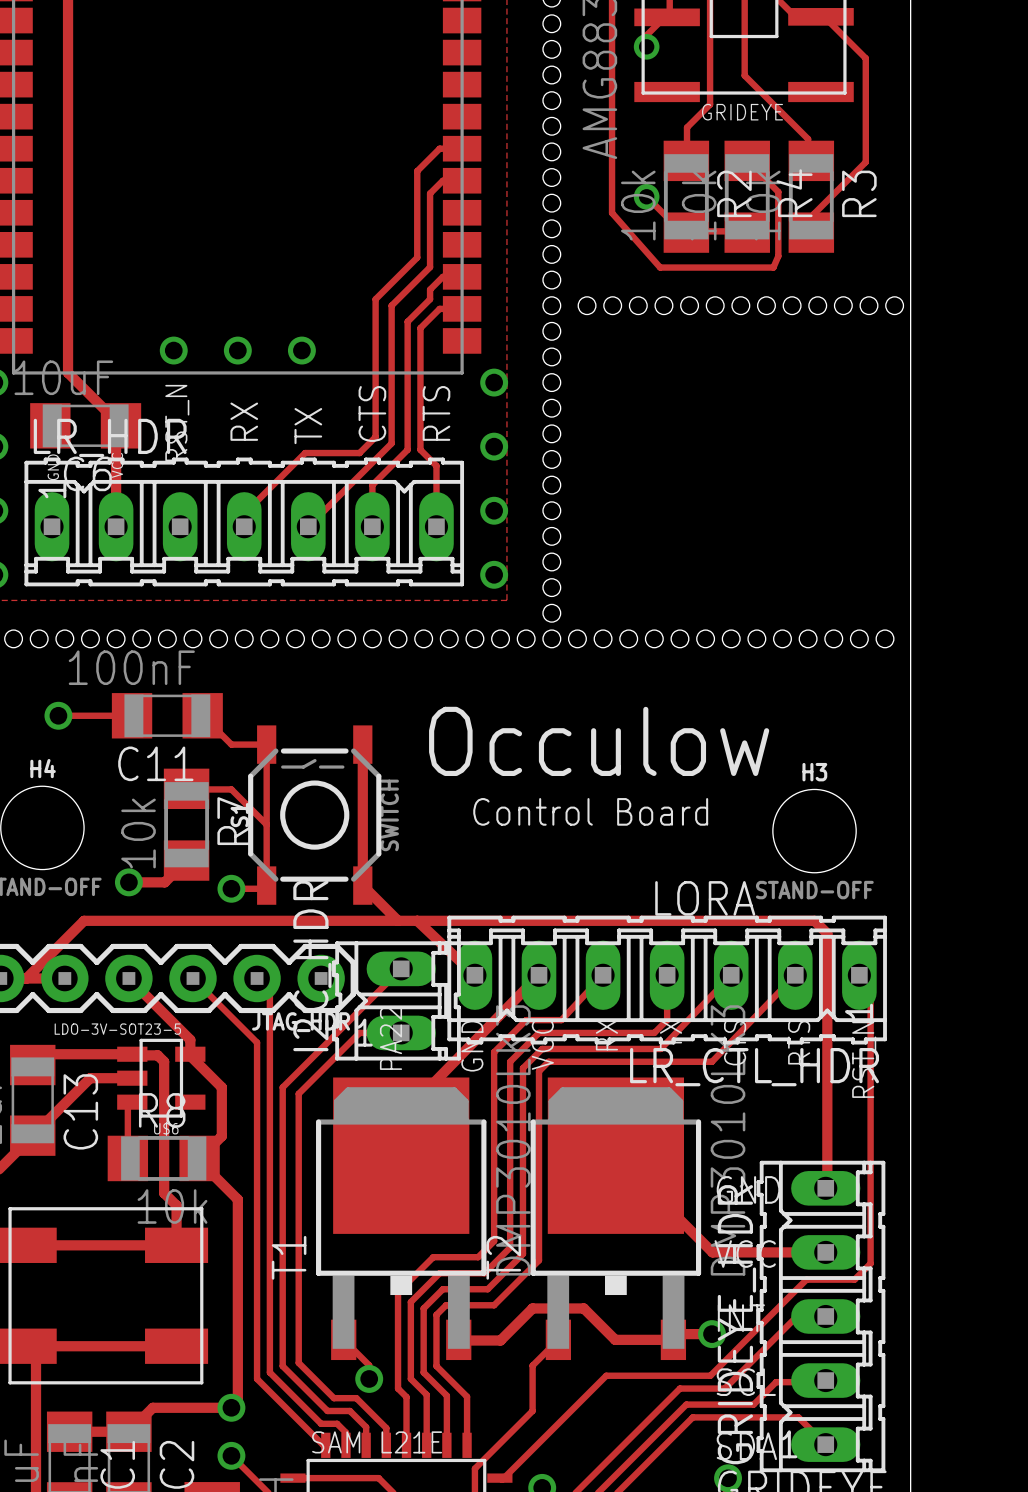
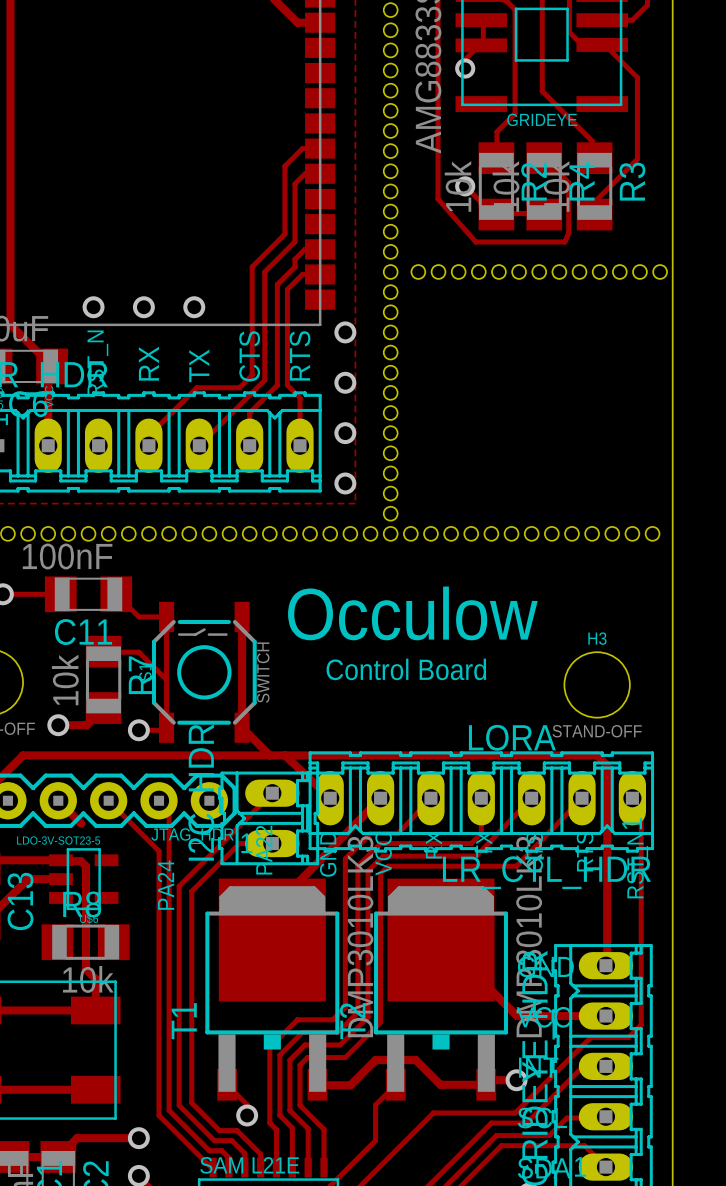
track: (158, 1007) (190, 1039) (190, 1055) (221, 1087) (221, 1136) (199, 1158) (199, 1161) (237, 1199) (237, 1401) (231, 1407) -> none
text: none -> PA24 (165, 885)
track: (132, 1102) (127, 1106) (127, 1158) -> none

